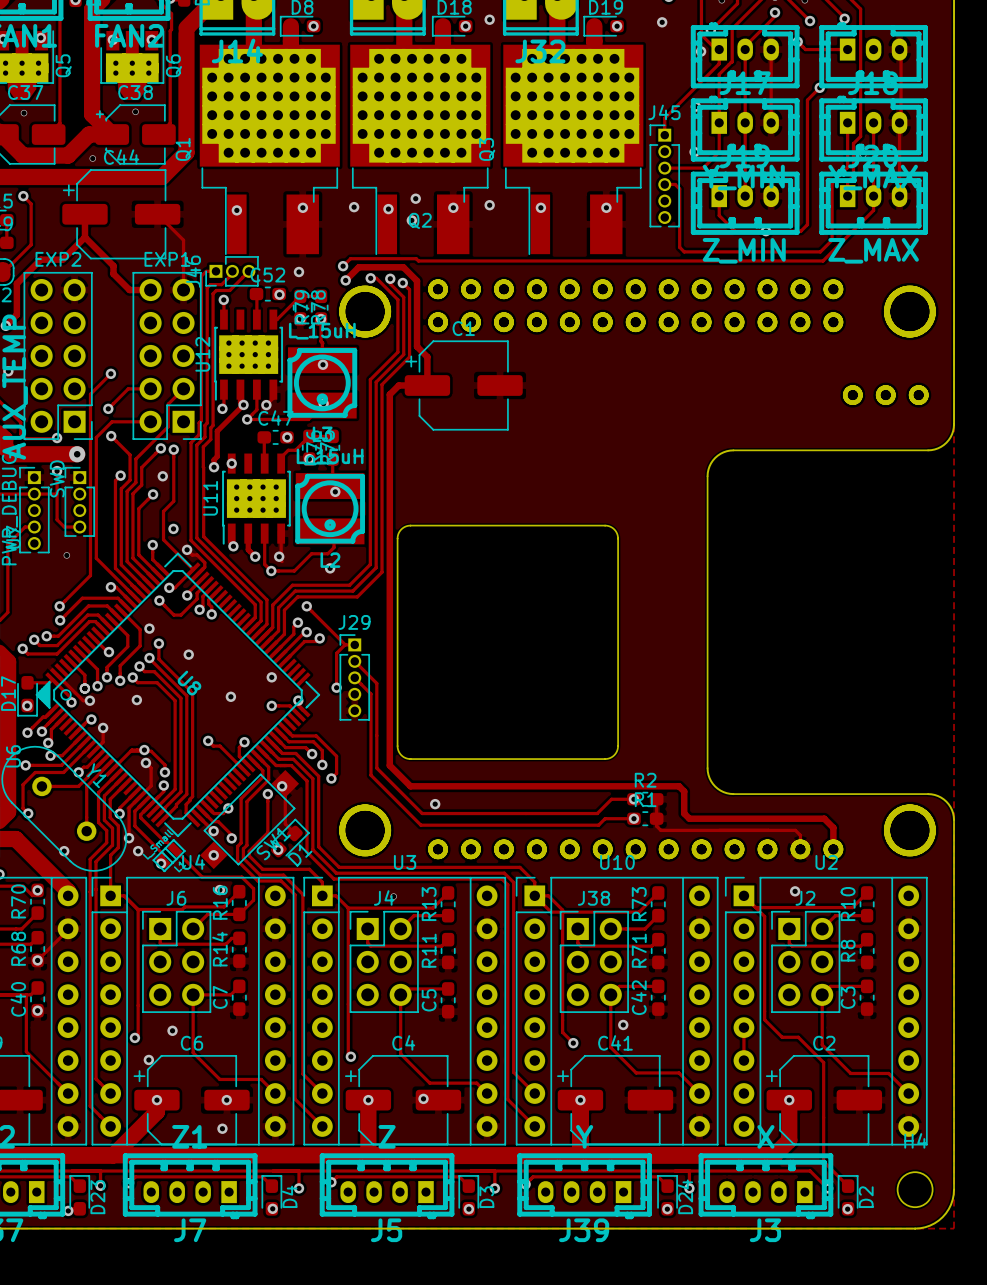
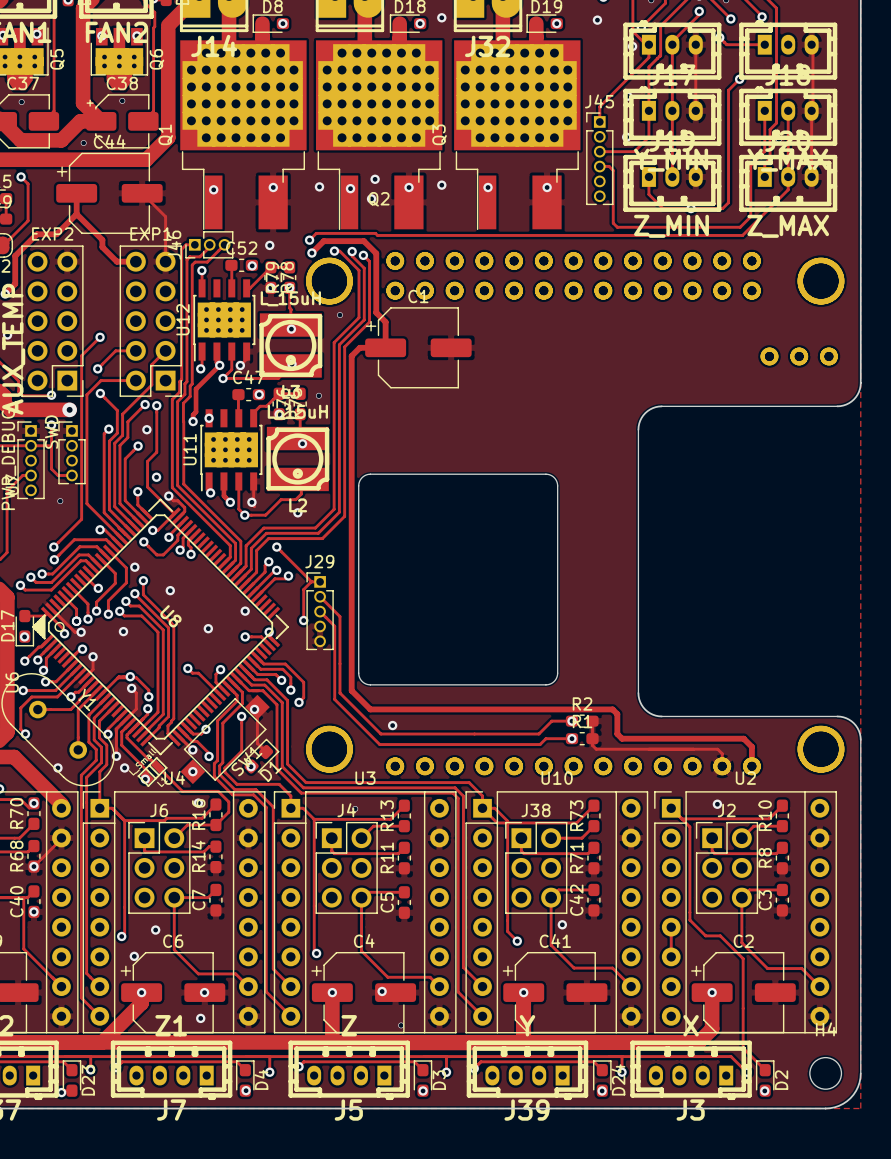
via: none -> (339, 315)
via: none -> (318, 395)
via: none -> (401, 1025)

